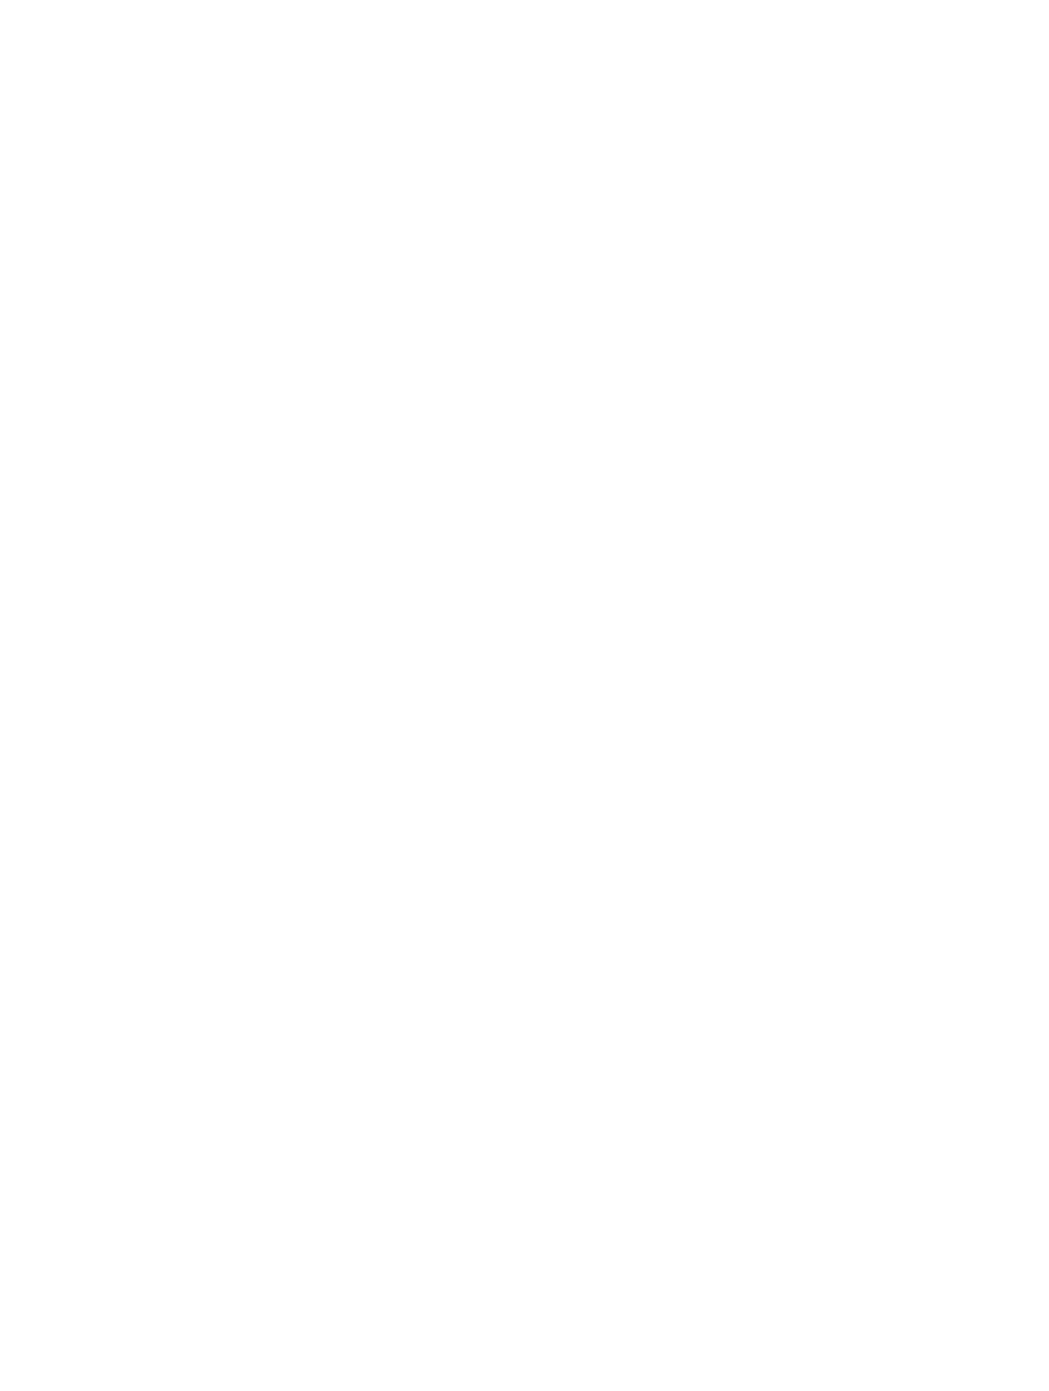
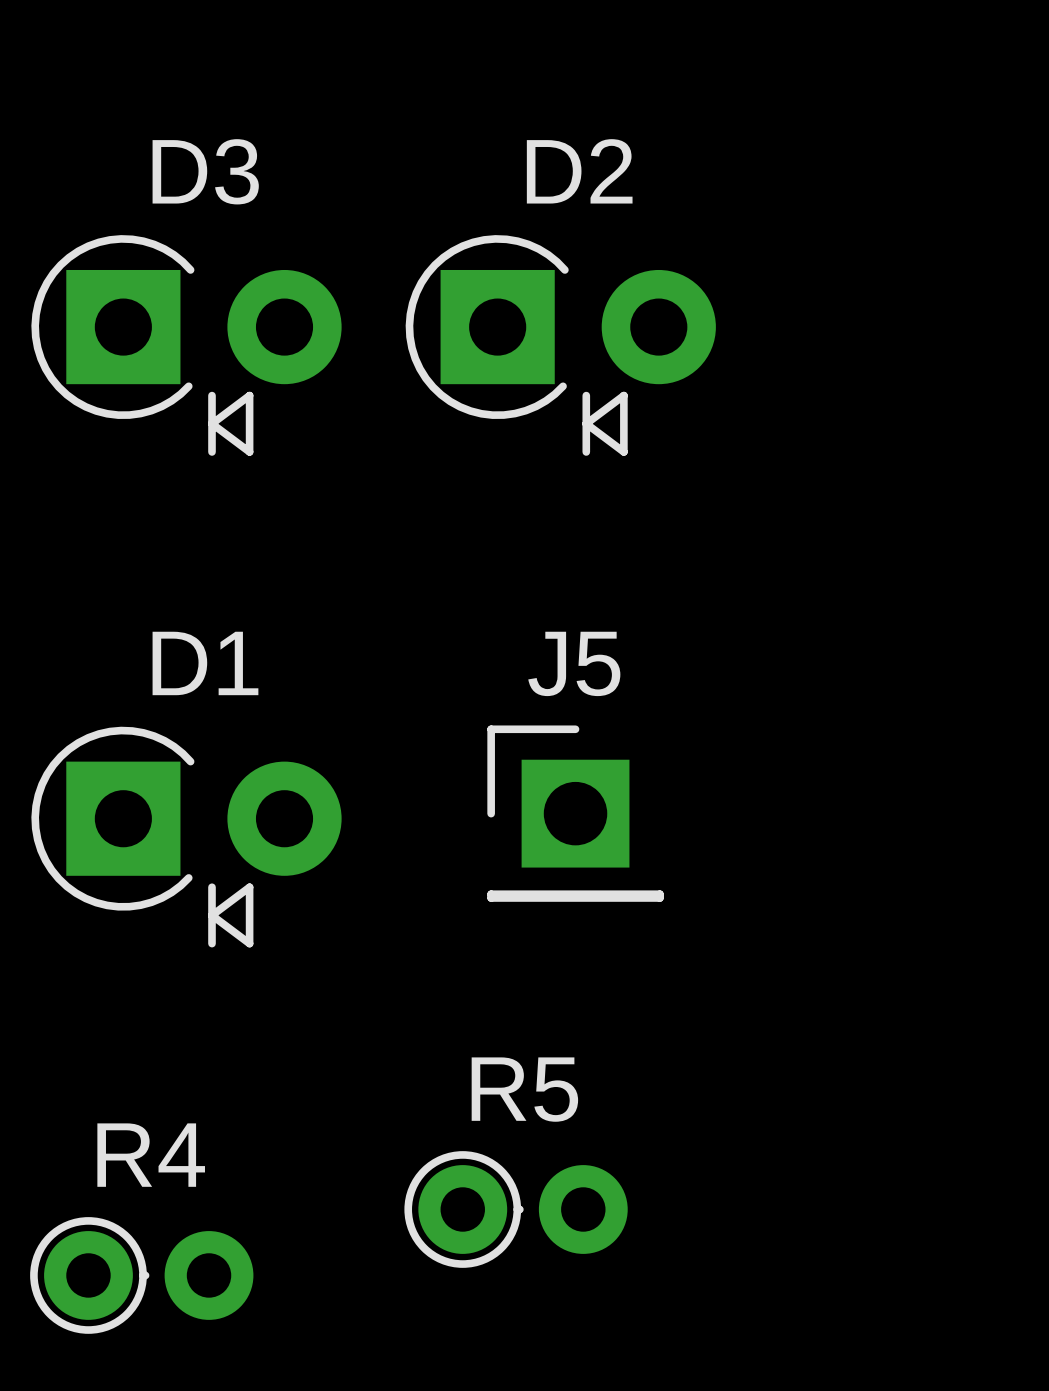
D3: none -> (186, 345)
D2: none -> (560, 345)
J5: none -> (575, 813)
D1: none -> (186, 837)
R5: none -> (516, 1209)
R4: none -> (141, 1275)

